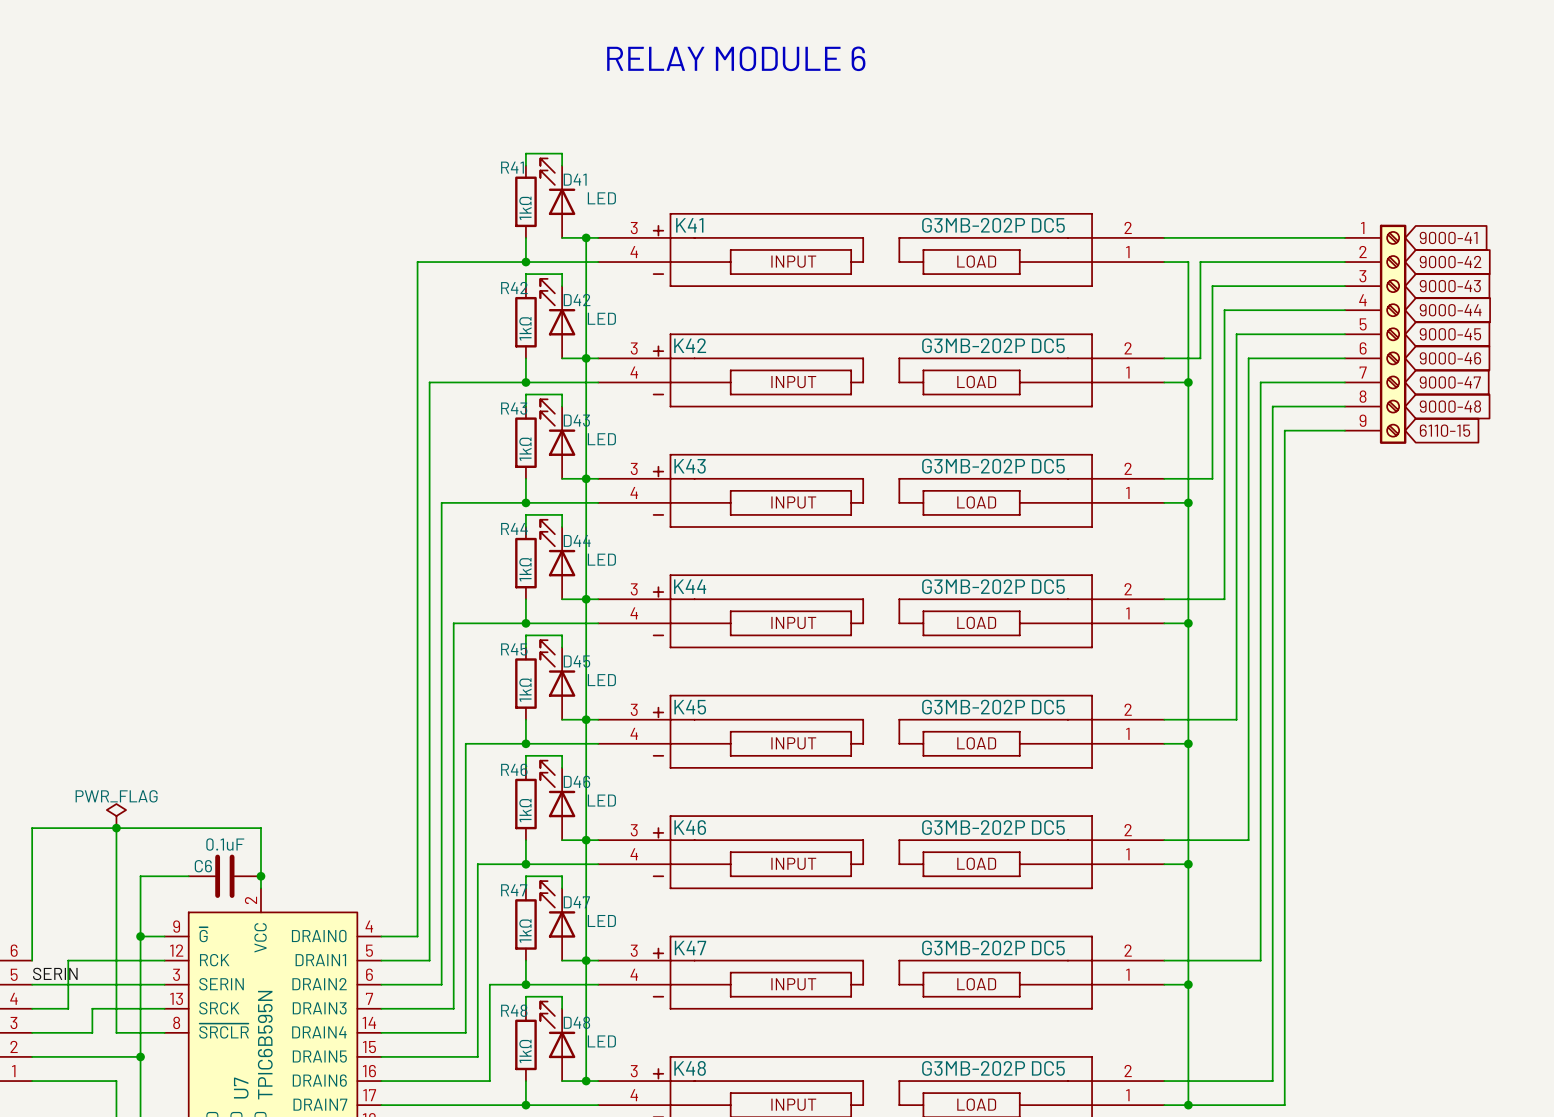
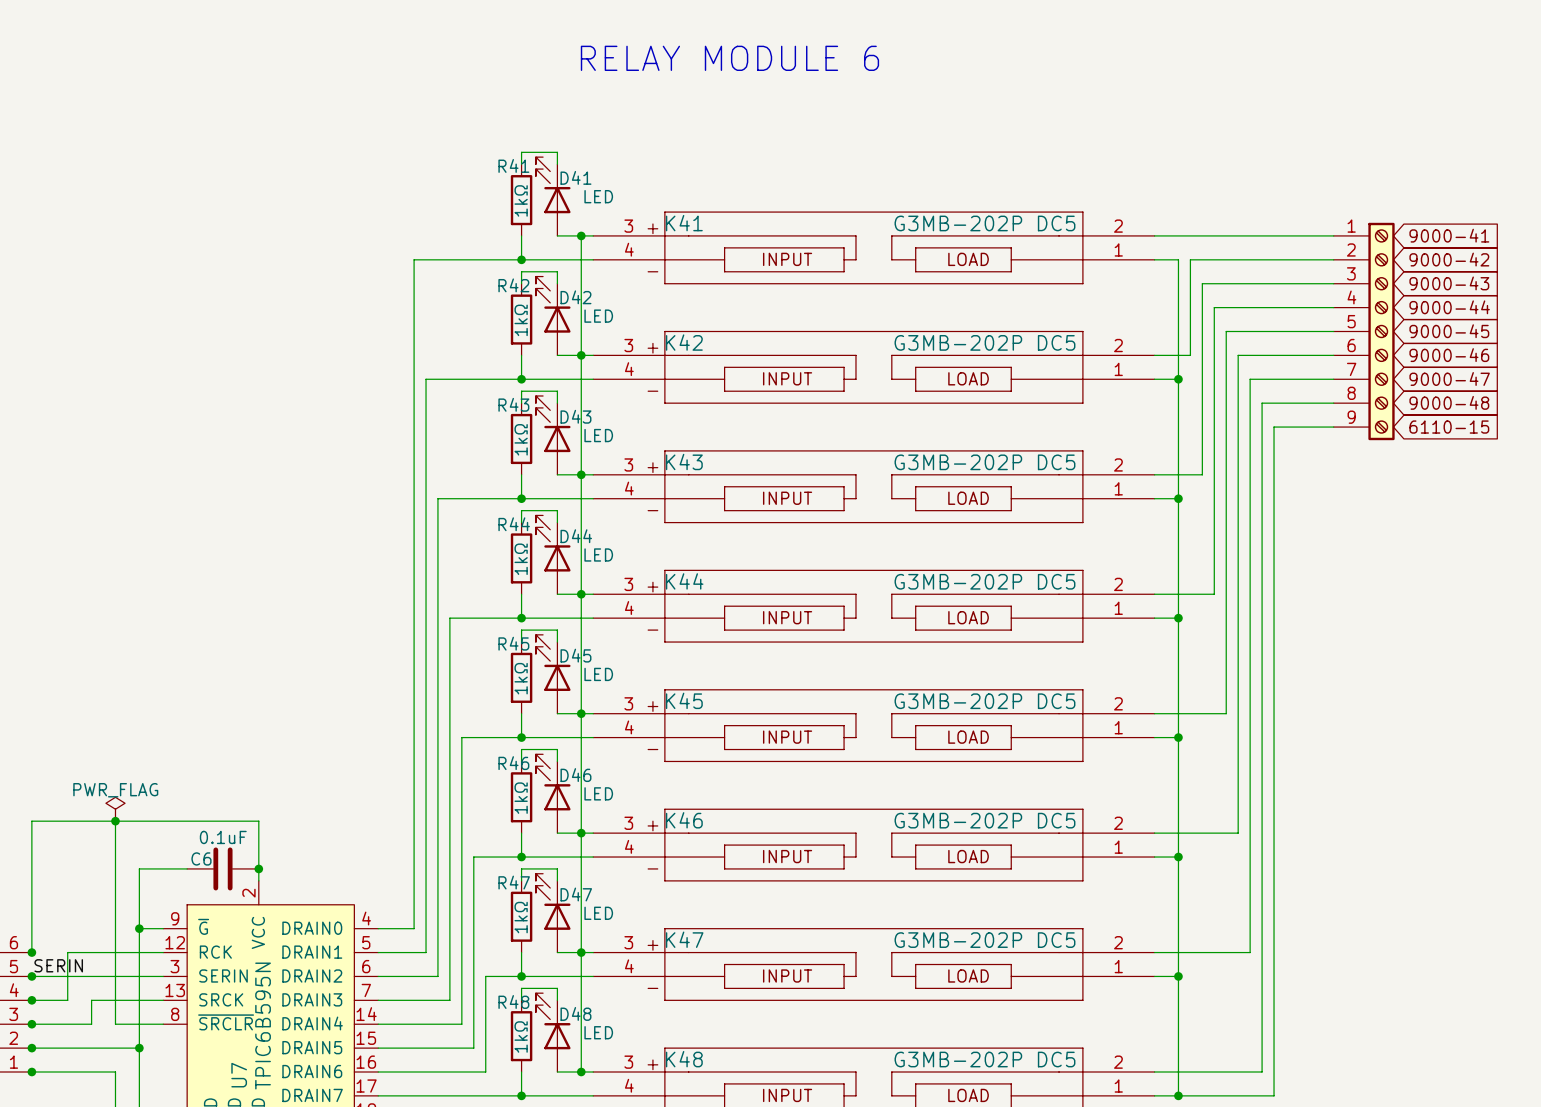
junction: none -> (31, 952)
junction: none -> (31, 976)
junction: none -> (31, 1000)
junction: none -> (31, 1024)
junction: none -> (31, 1048)
junction: none -> (31, 1072)

